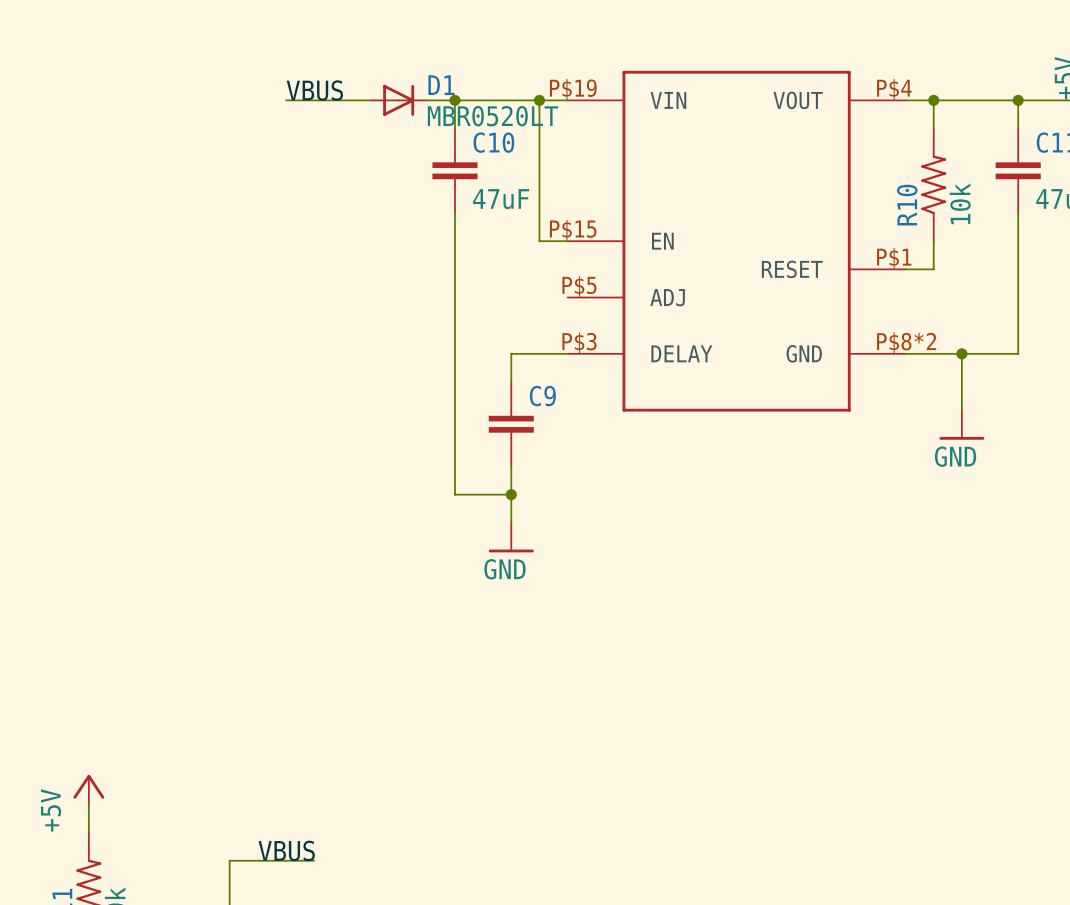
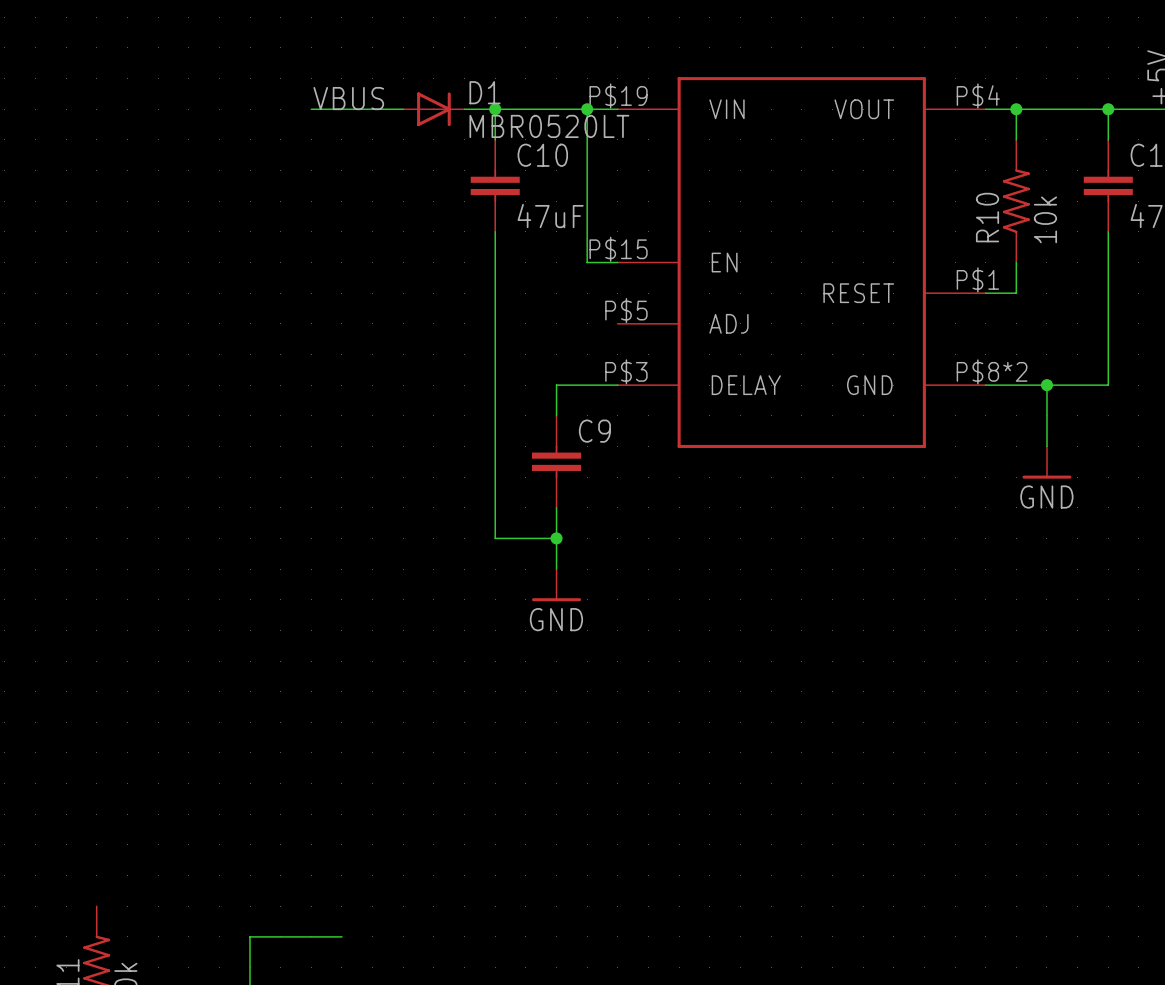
power symbol: +5V (88, 789) -> none
wire: (88, 804) (88, 832) -> none
label: VBUS (286, 850) -> none

